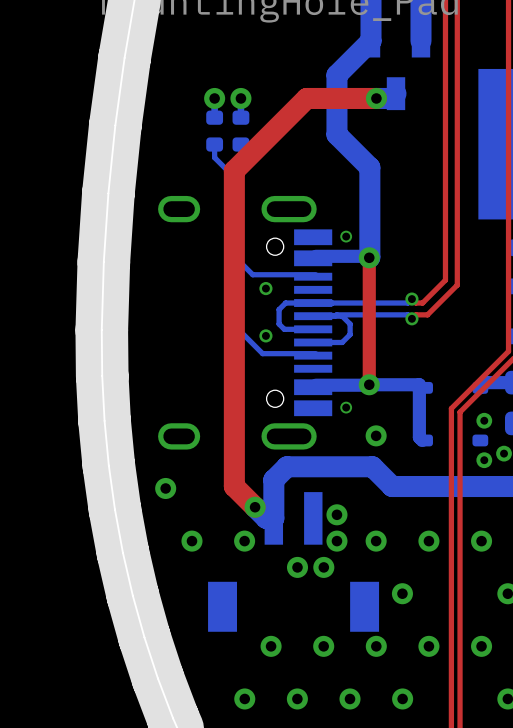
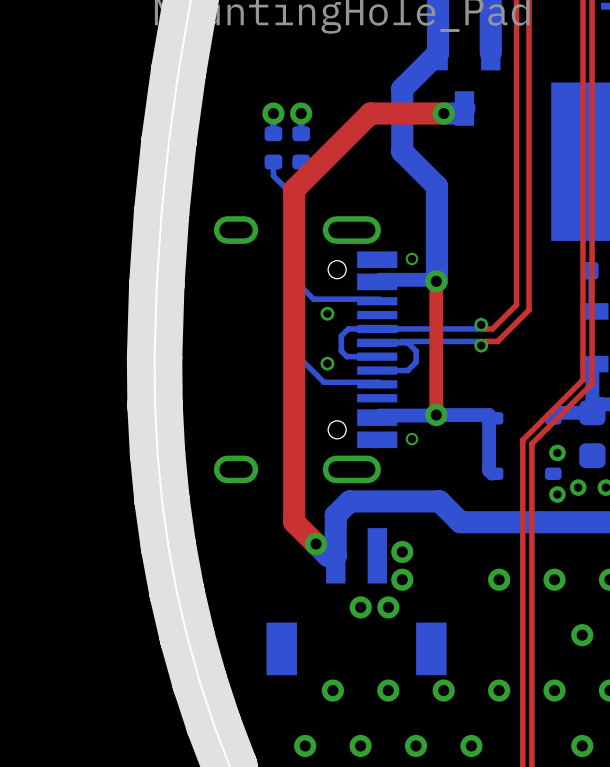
via: (376, 435) -> none
via: (165, 488) -> none
via: (191, 541) -> none
via: (244, 541) -> none
via: (376, 541) -> none
via: (402, 593) -> none

